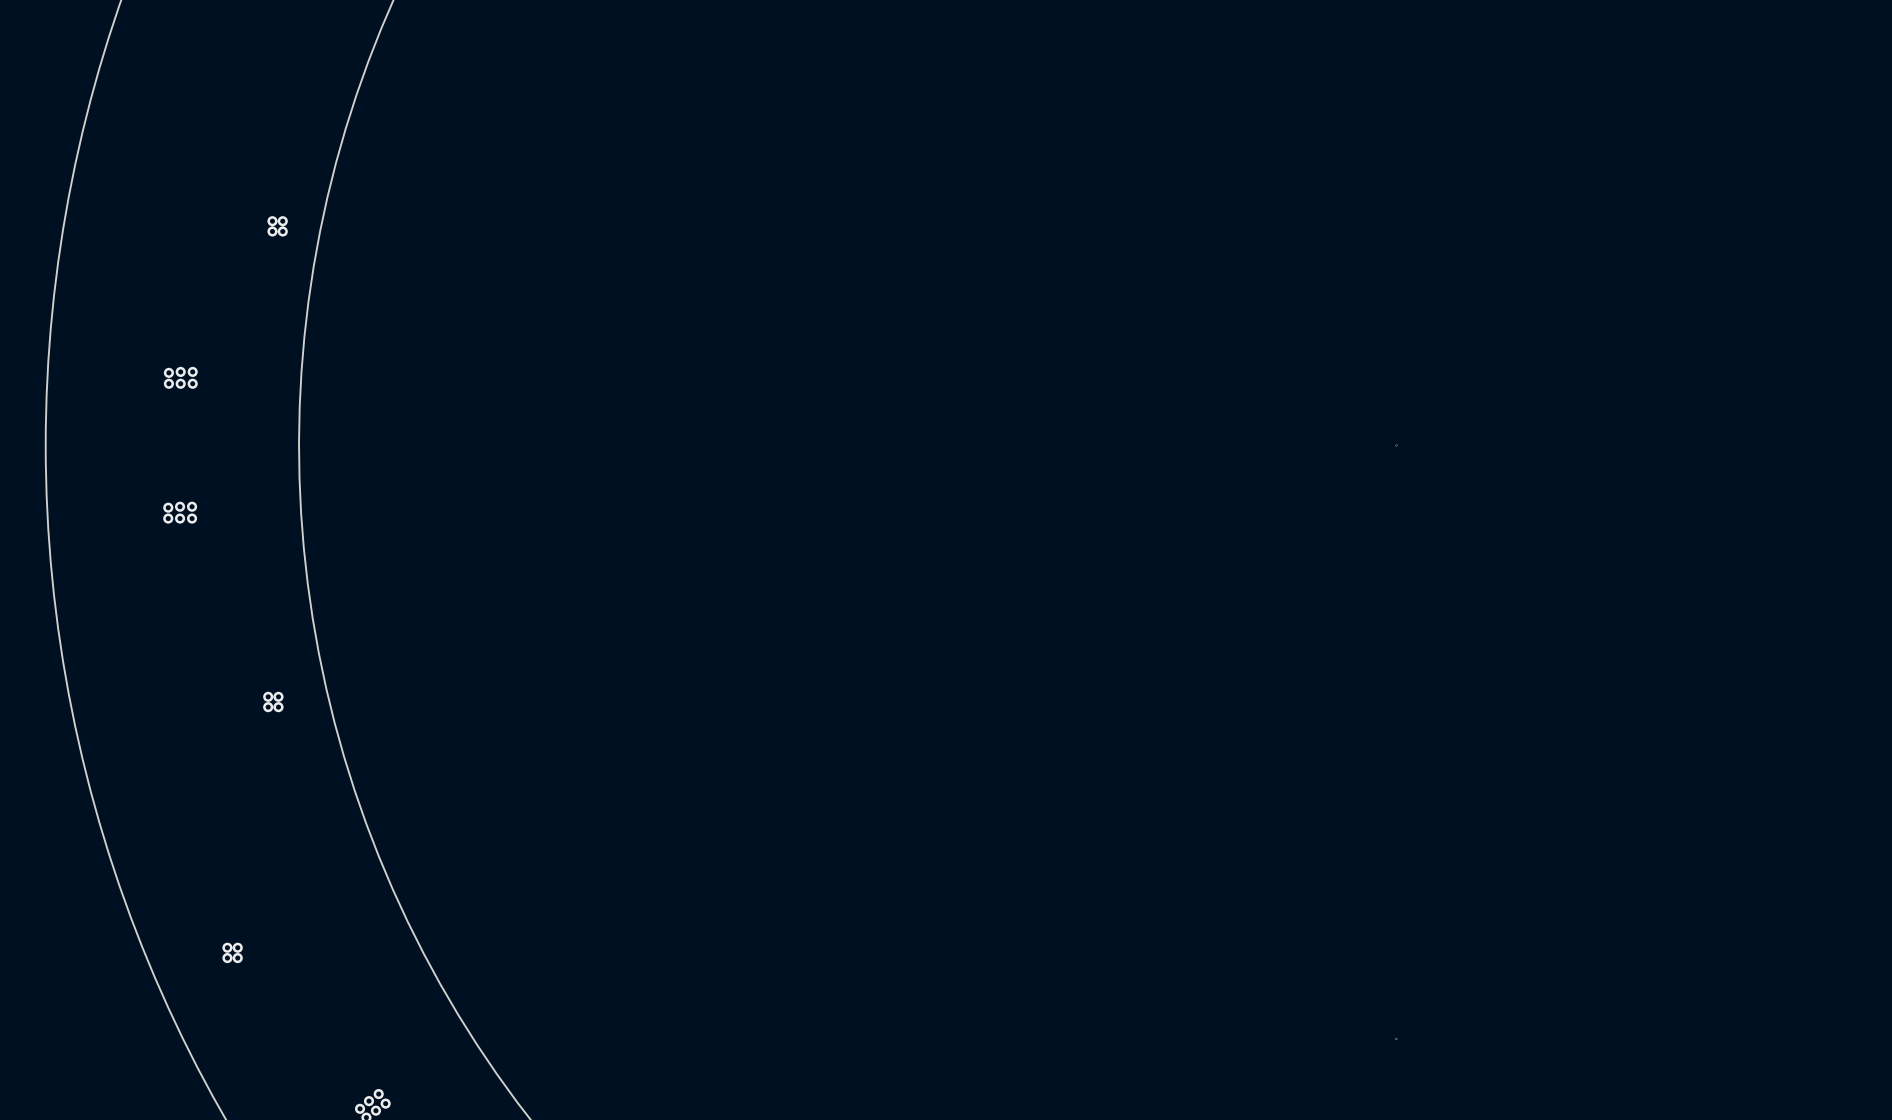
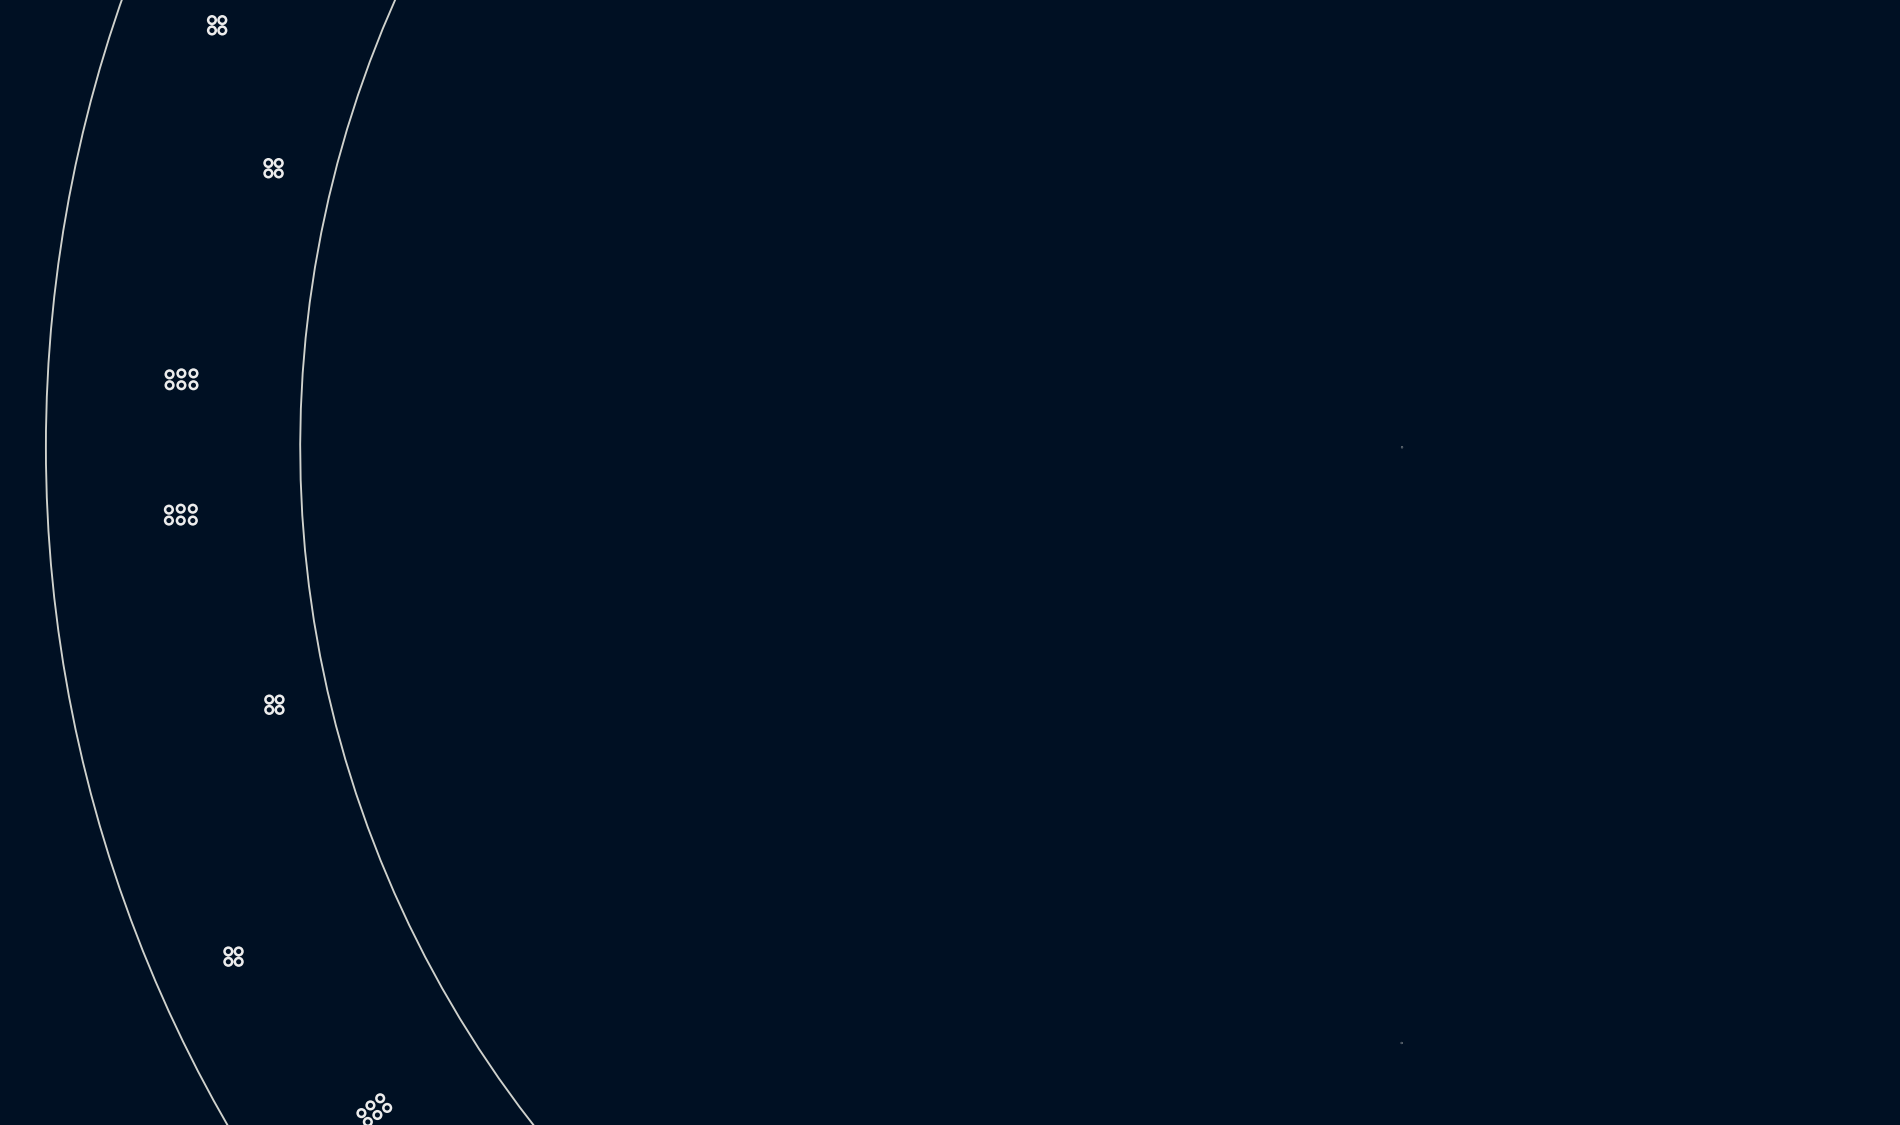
via: none -> (211, 20)
via: none -> (222, 20)
via: none -> (211, 30)
via: none -> (222, 30)
via: none -> (268, 163)
via: none -> (278, 163)
via: none -> (268, 173)
via: none -> (278, 173)
via: (272, 221) -> none
via: (282, 221) -> none
via: (272, 231) -> none
via: (282, 231) -> none

